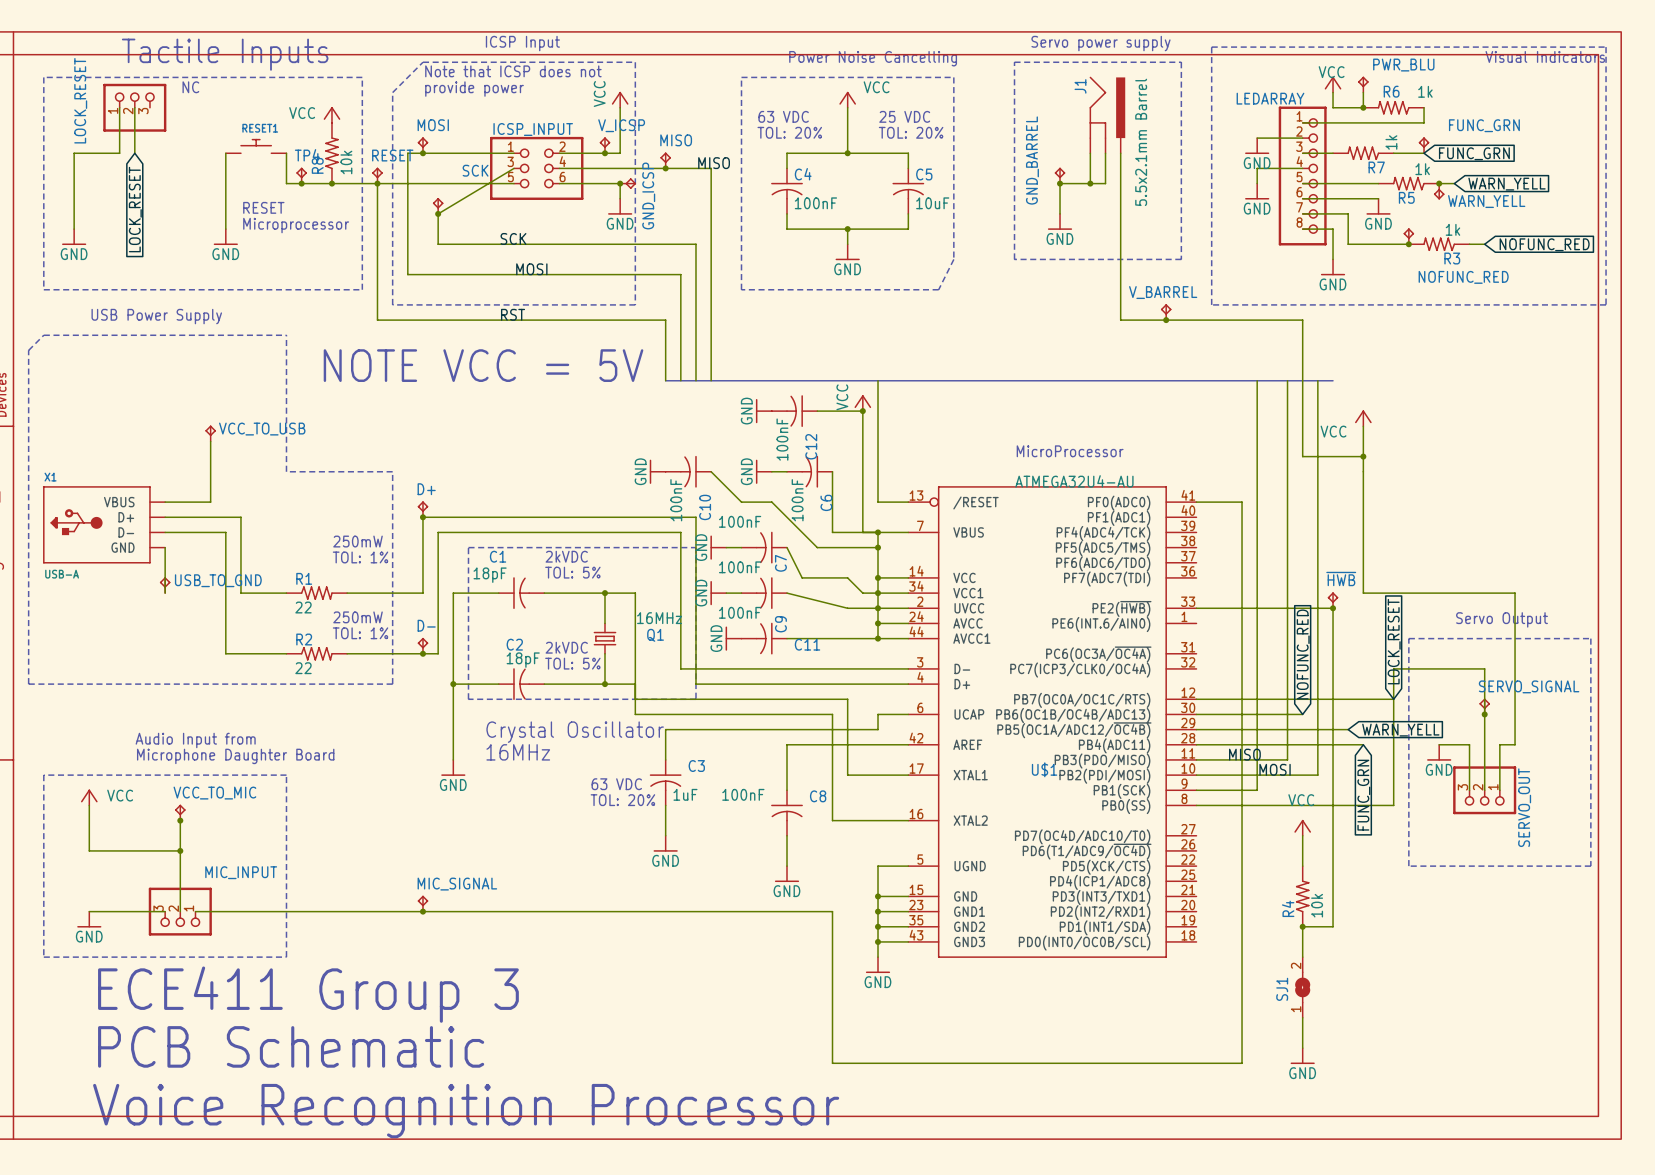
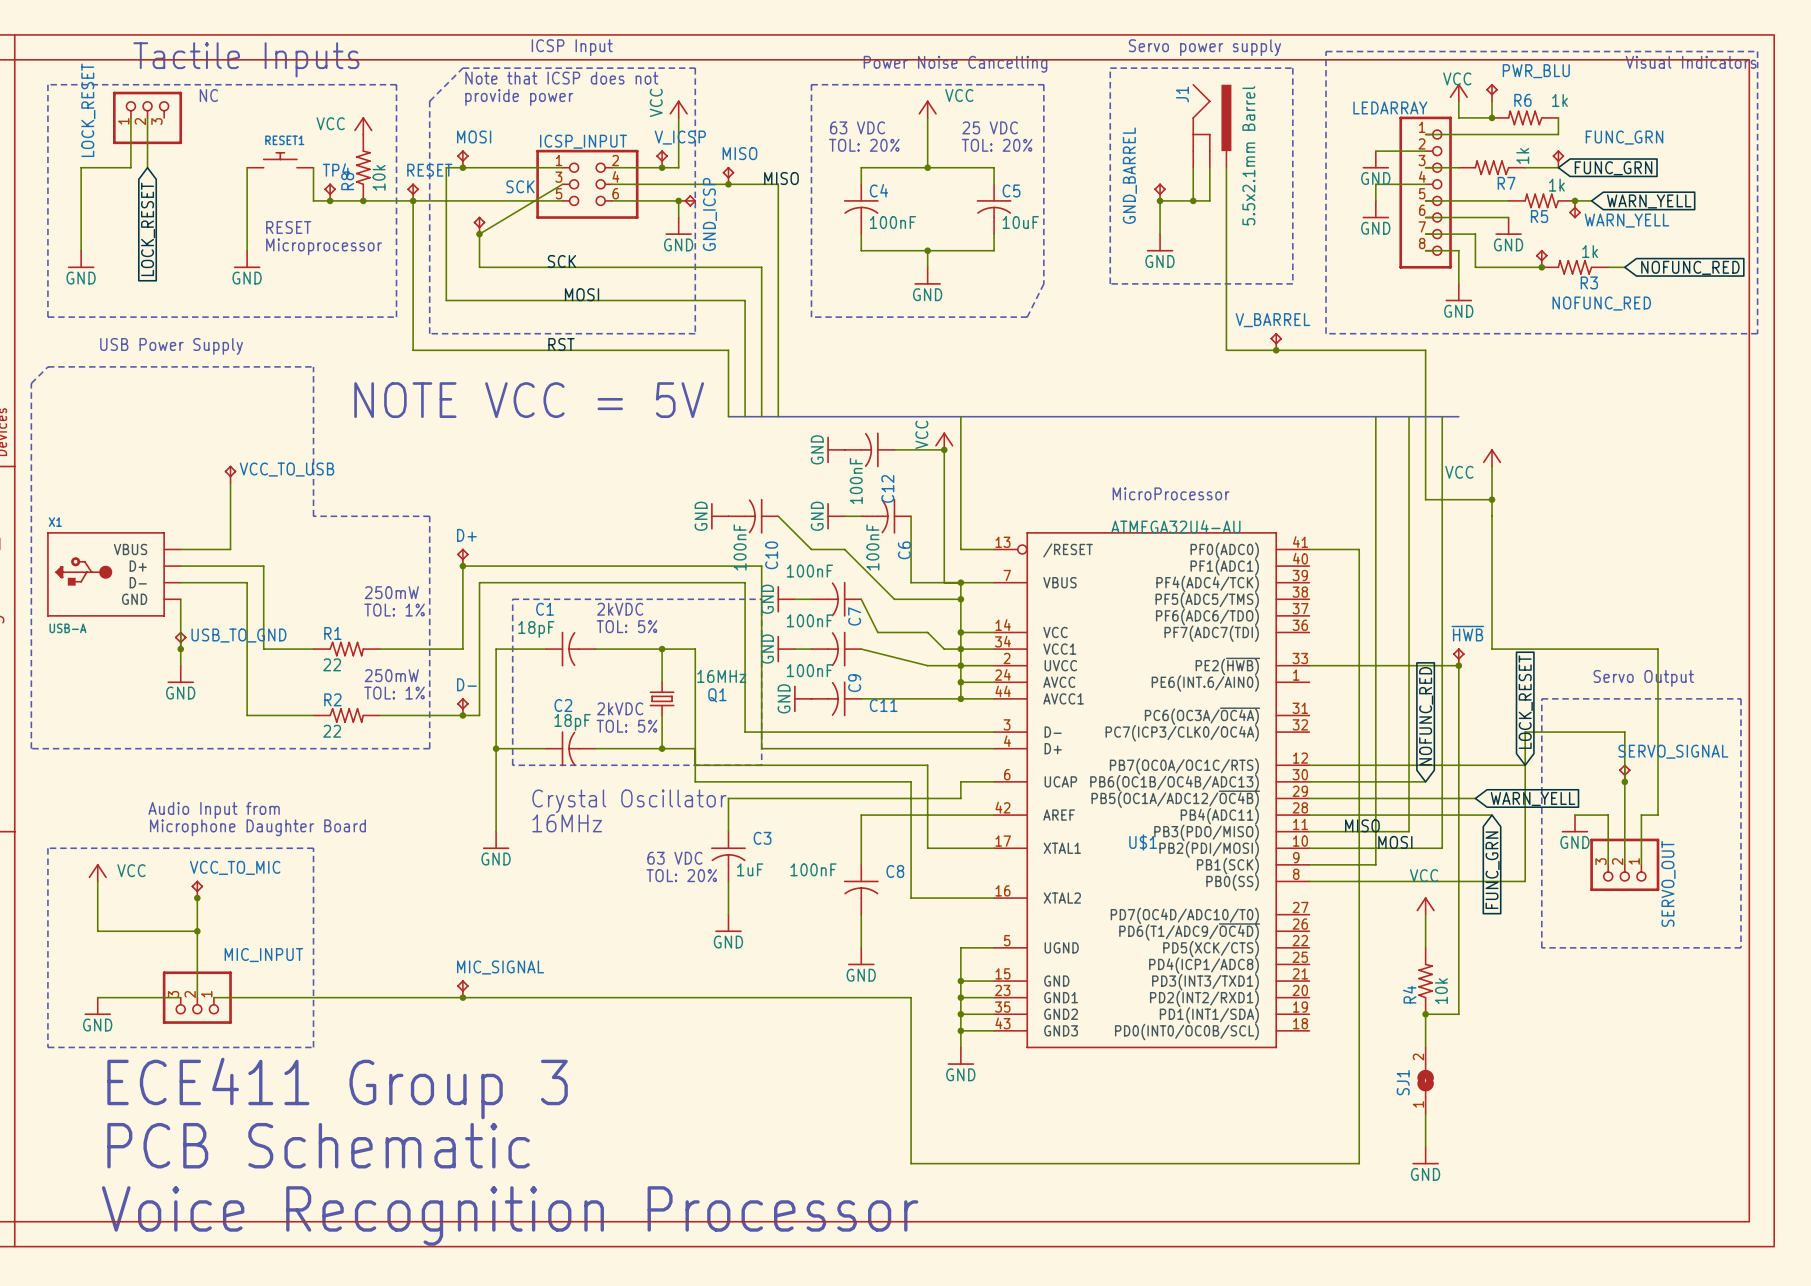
wire: none -> (180, 649) (180, 665)
junction: none -> (180, 649)
power symbol: none -> GND (180, 674)

